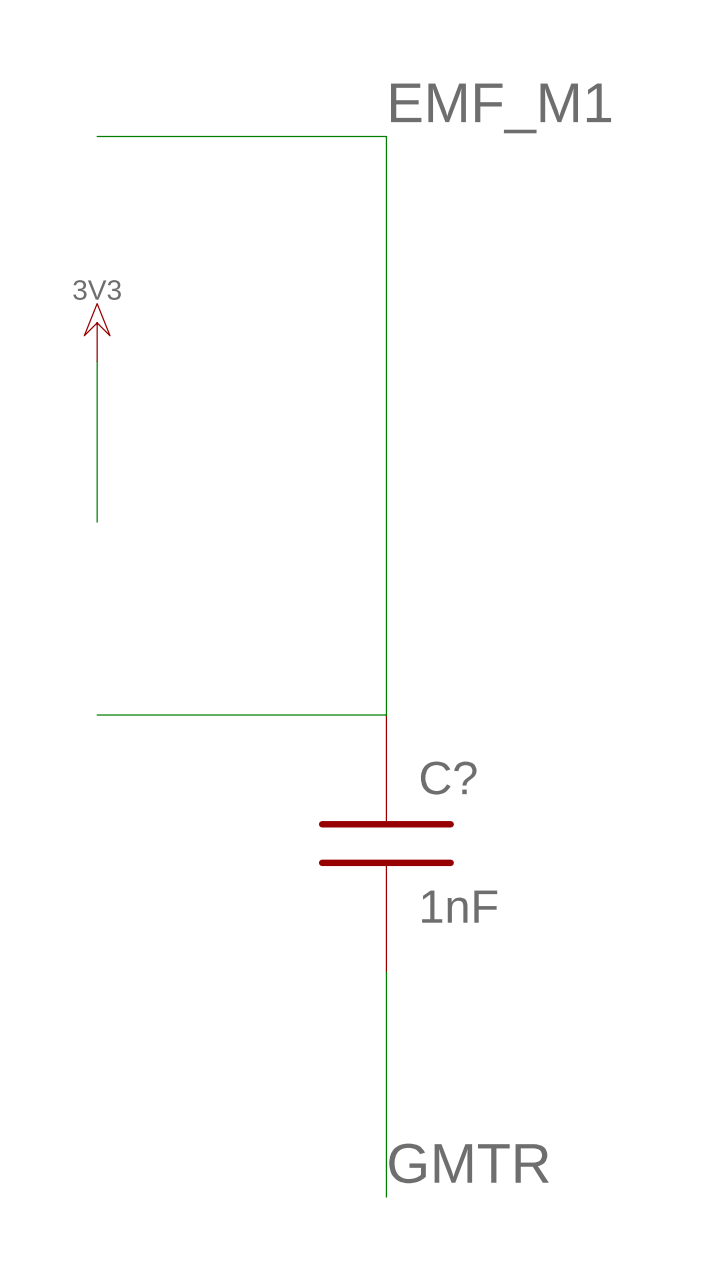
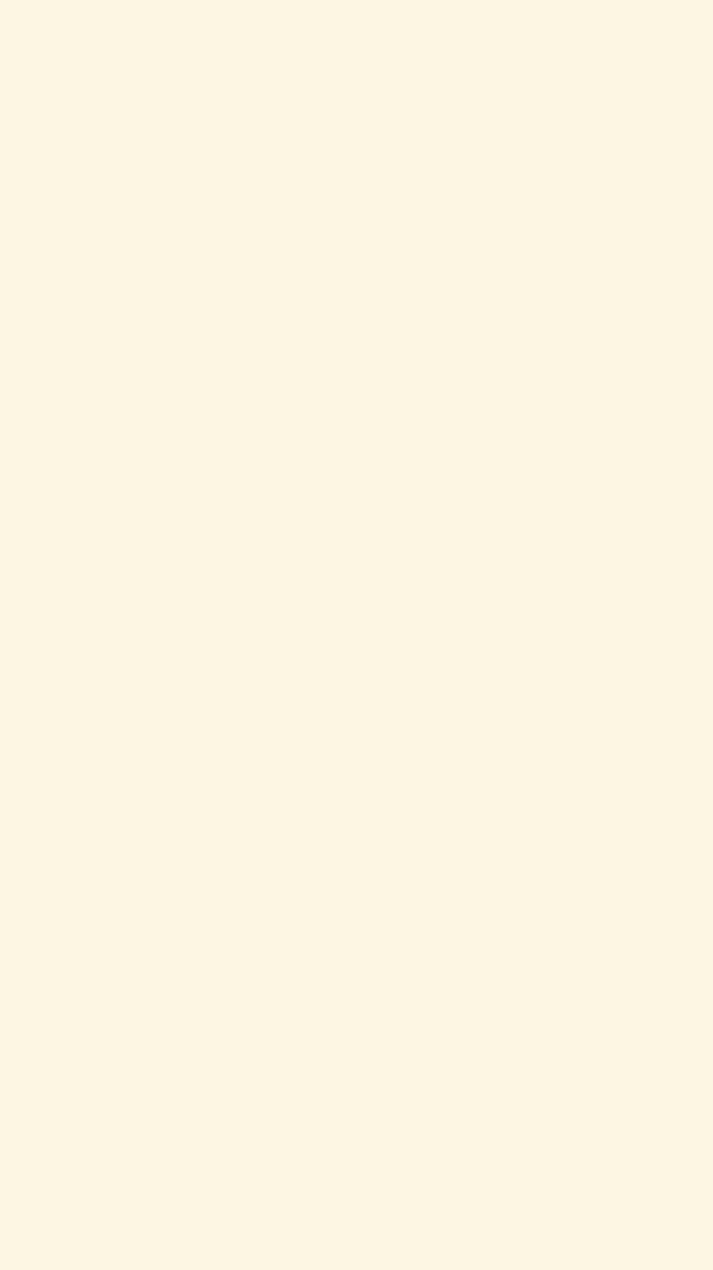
label: EMF_M1 (501, 108) -> none
wire: (97, 136) (386, 136) (386, 715) (97, 715) -> none
power symbol: 3V3 (97, 332) -> none
wire: (97, 361) (97, 522) -> none
C?: 1nF (386, 843) -> none
wire: (386, 972) (386, 1197) -> none
label: GMTR (469, 1163) -> none

